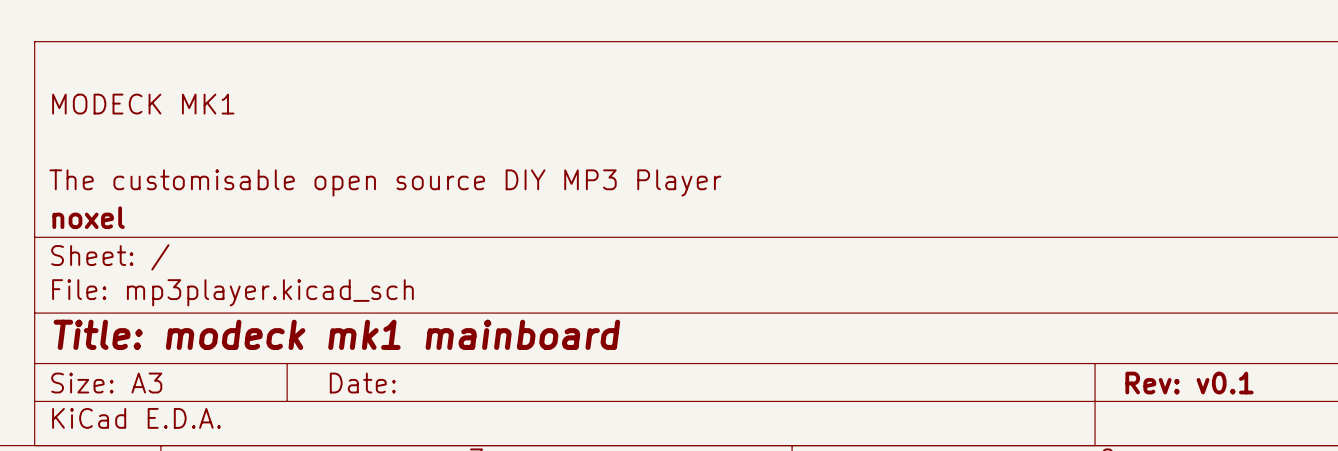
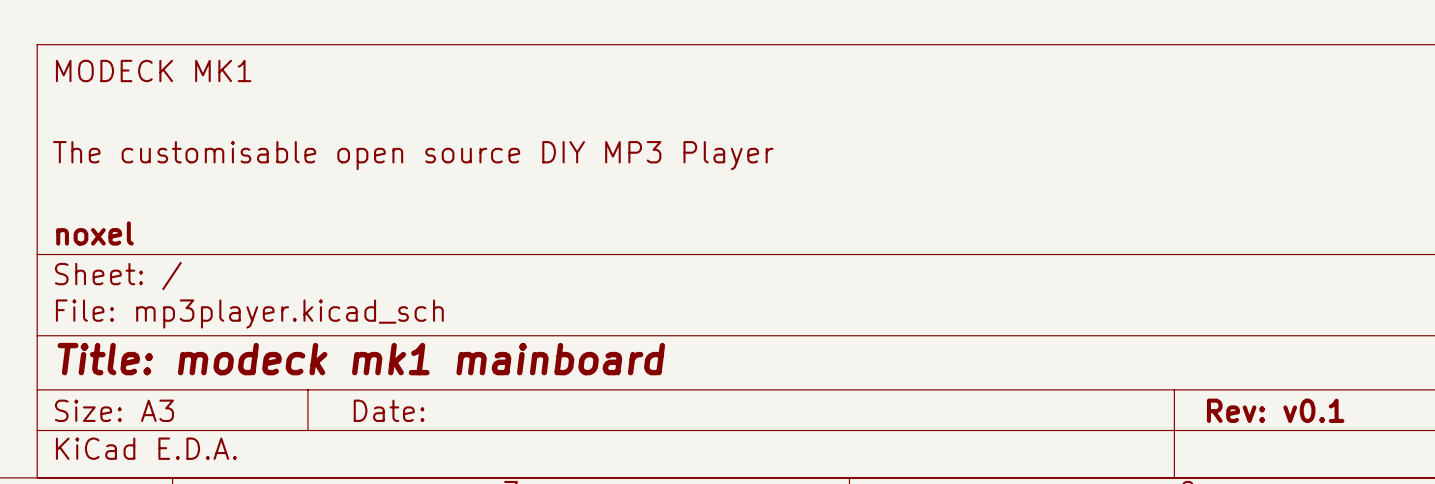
title block position: MODECK MK1 (143, 104) -> MODECK MK1 (153, 70)
title block position: The customisable open source DIY MP3 Player (385, 182) -> The customisable open source DIY MP3 Player (413, 155)

